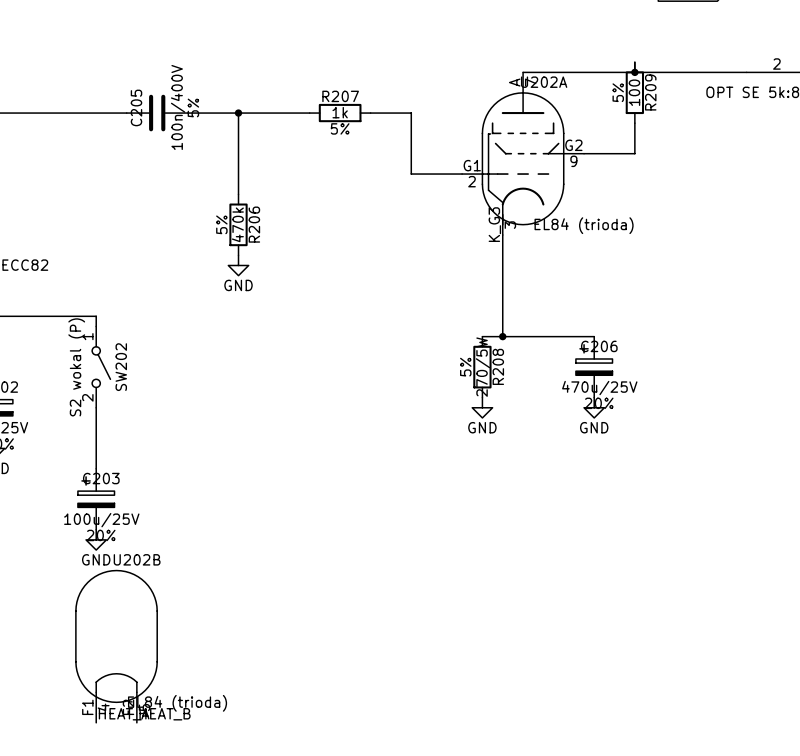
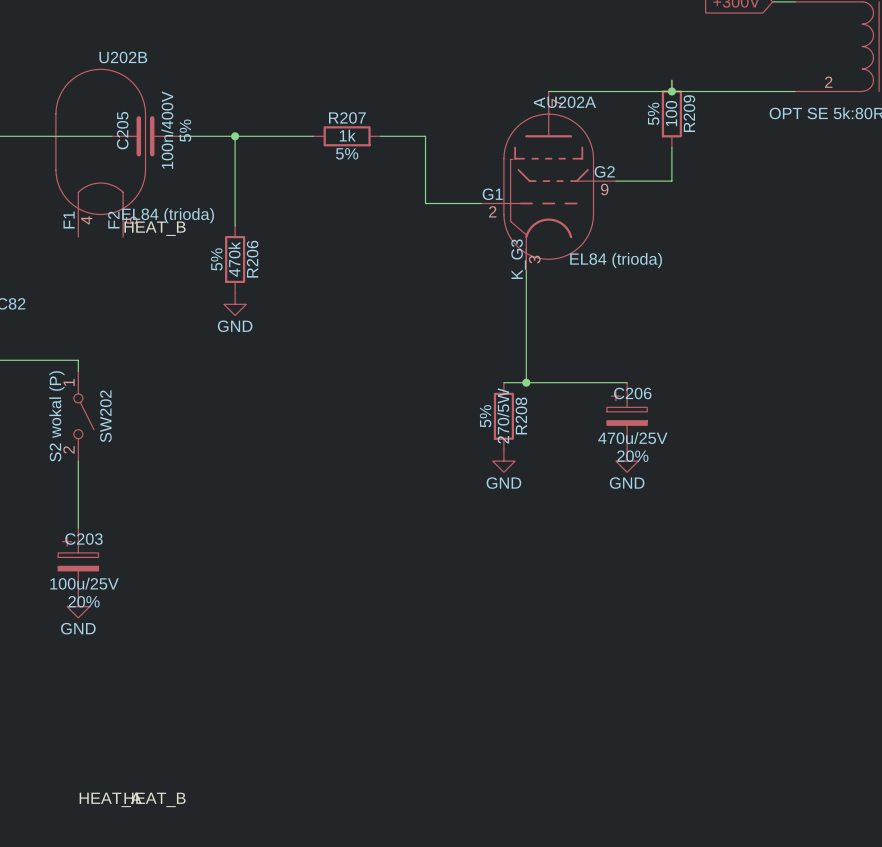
label: none -> HEAT_B (155, 228)
U202B position: (116, 646) -> (100, 153)

